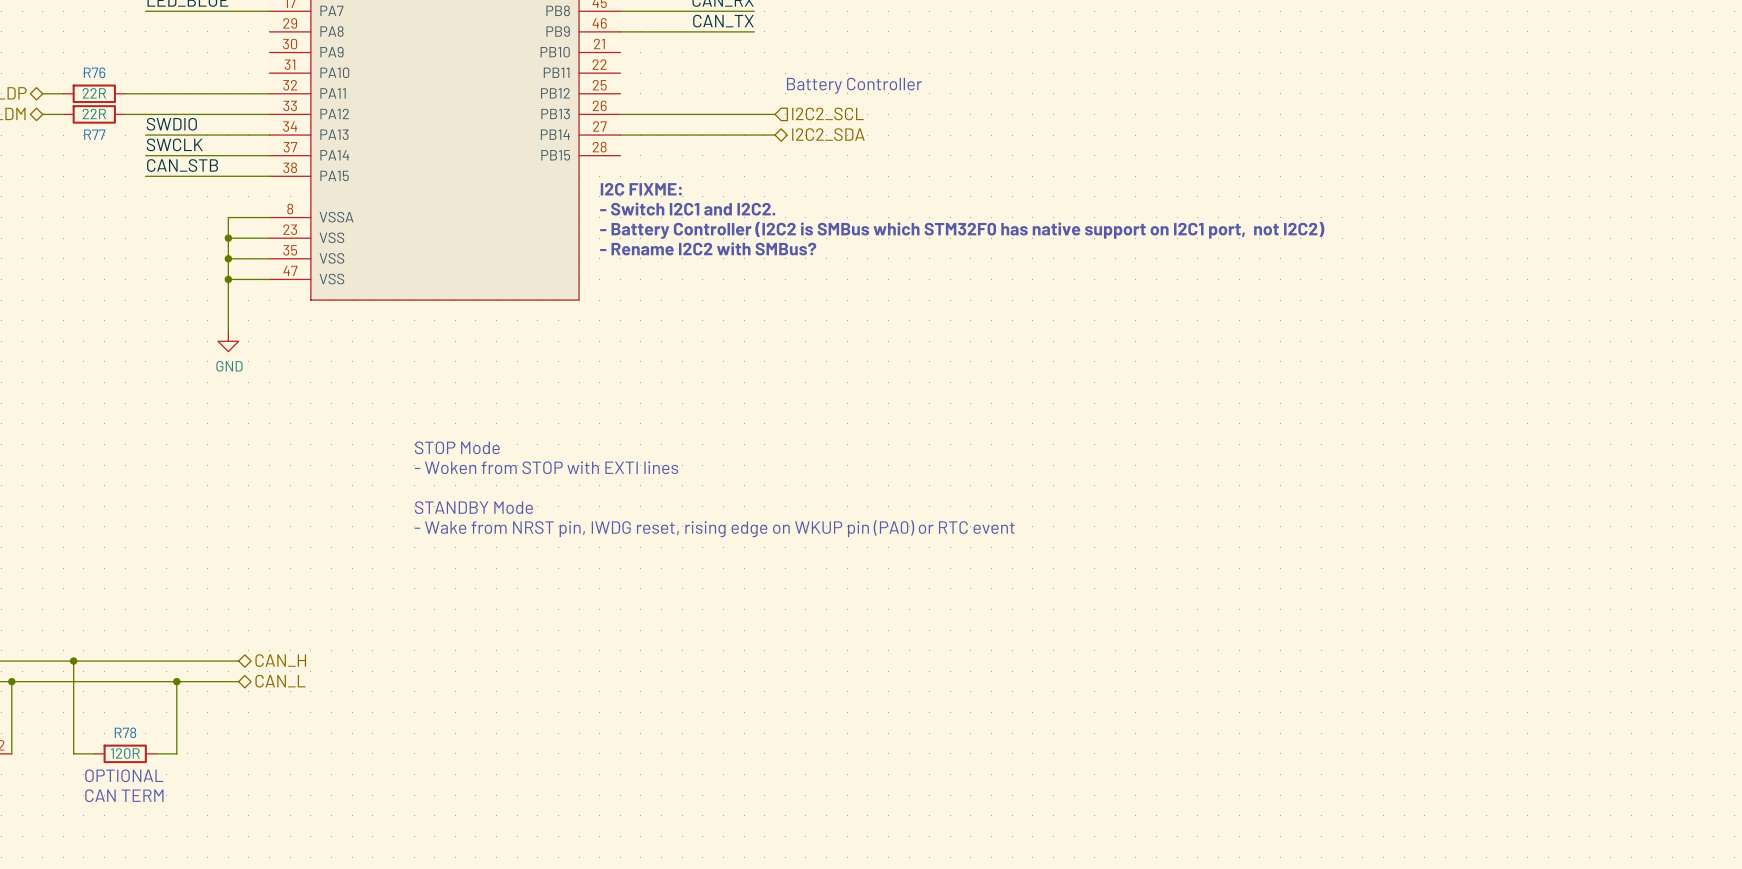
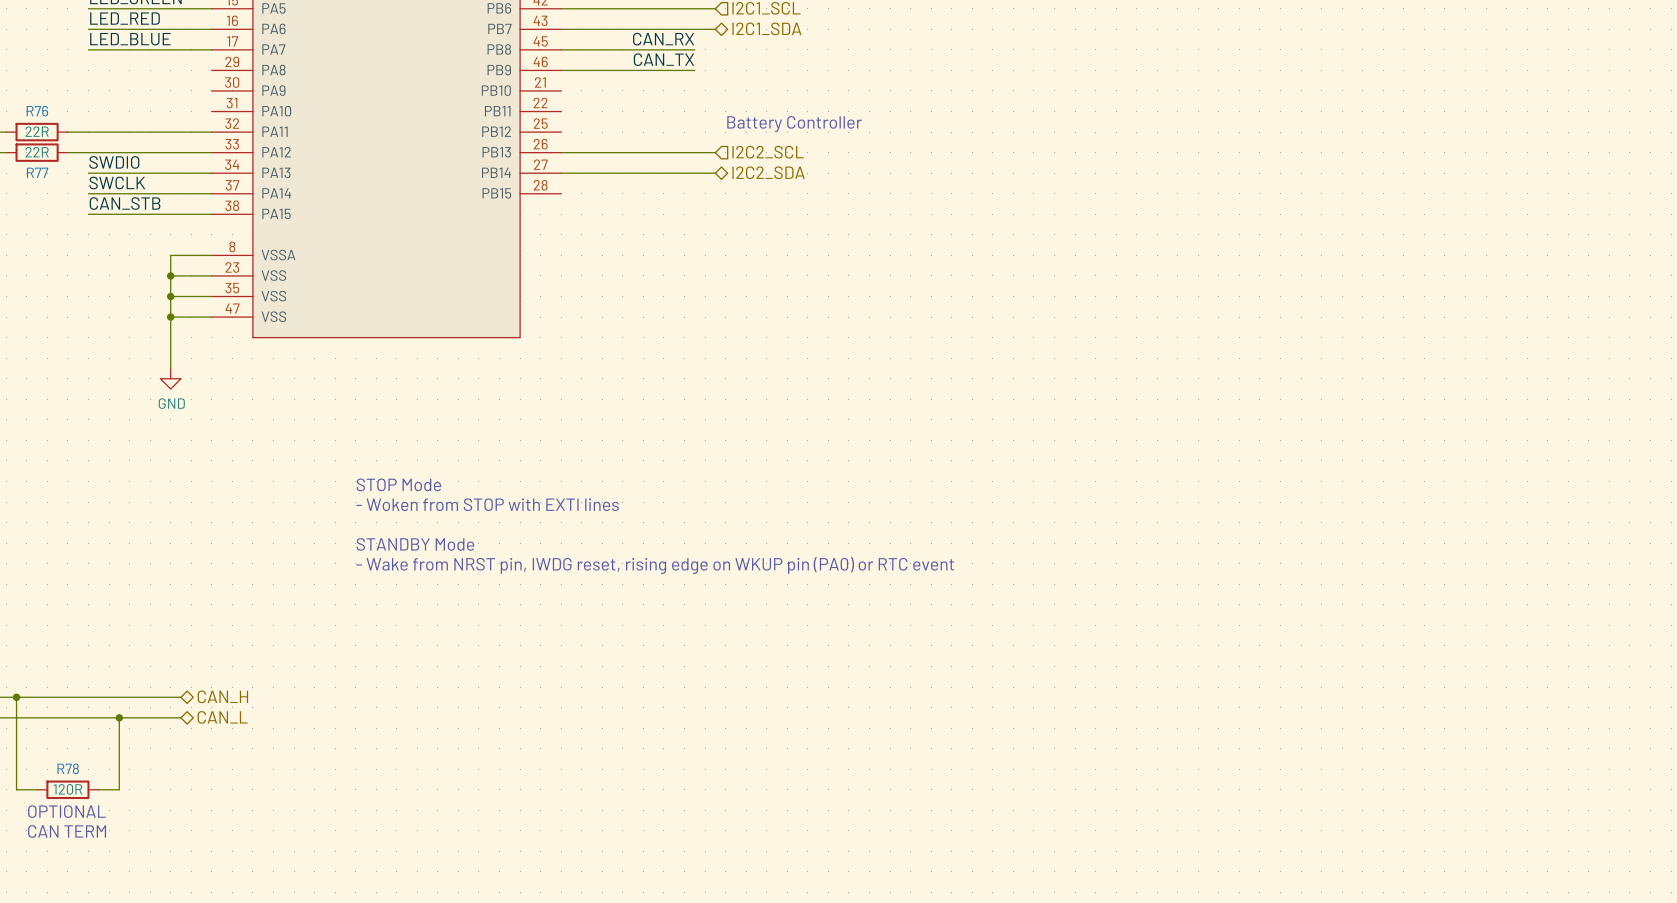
text: I2C FIXME: (641, 189) -> none
text: - Switch I2C1 and I2C2. (687, 209) -> none
text: - Battery Controller (I2C2 is SMBus which STM32F0 has native support on I2C1 port, not I2C2) (962, 230) -> none
text: - Rename I2C2 with SMBus? (708, 248) -> none

